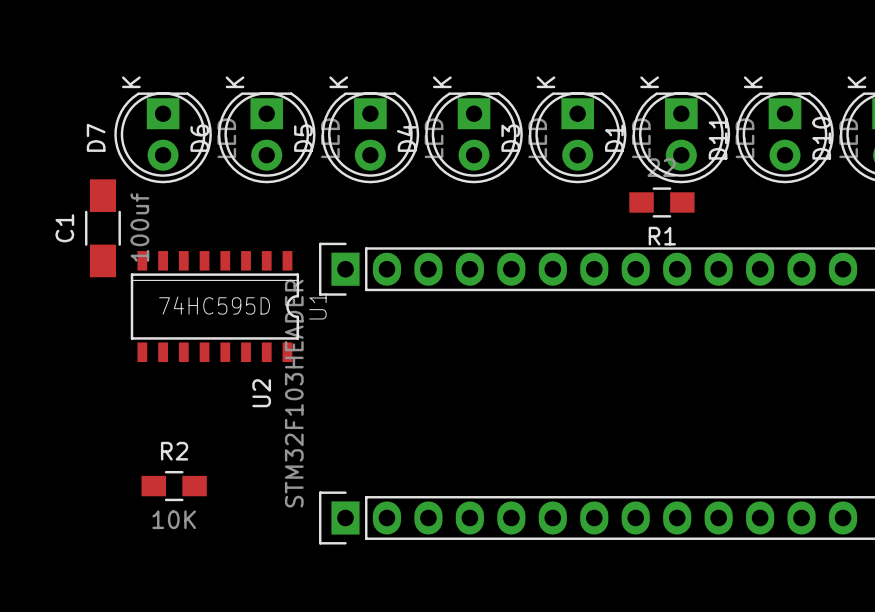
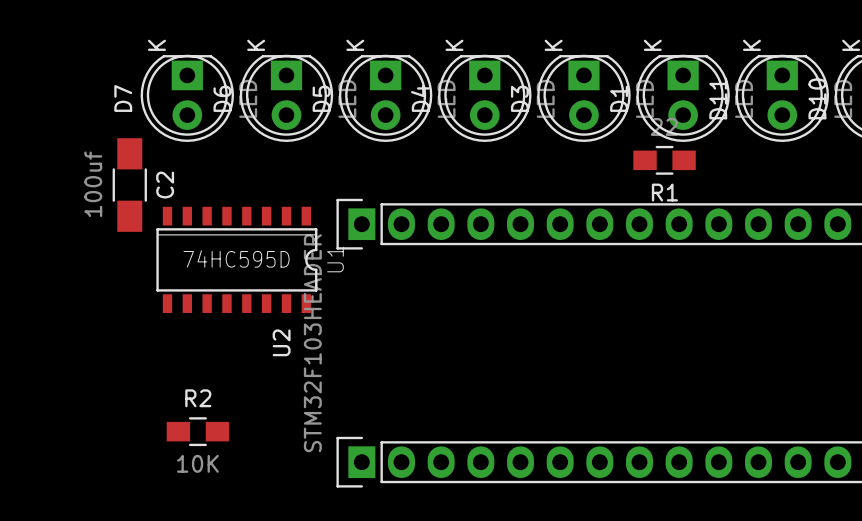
C1 value position: 100uf (139, 227) -> 100uf (93, 184)
C1 name: C1 (64, 228) -> C2 (165, 185)

